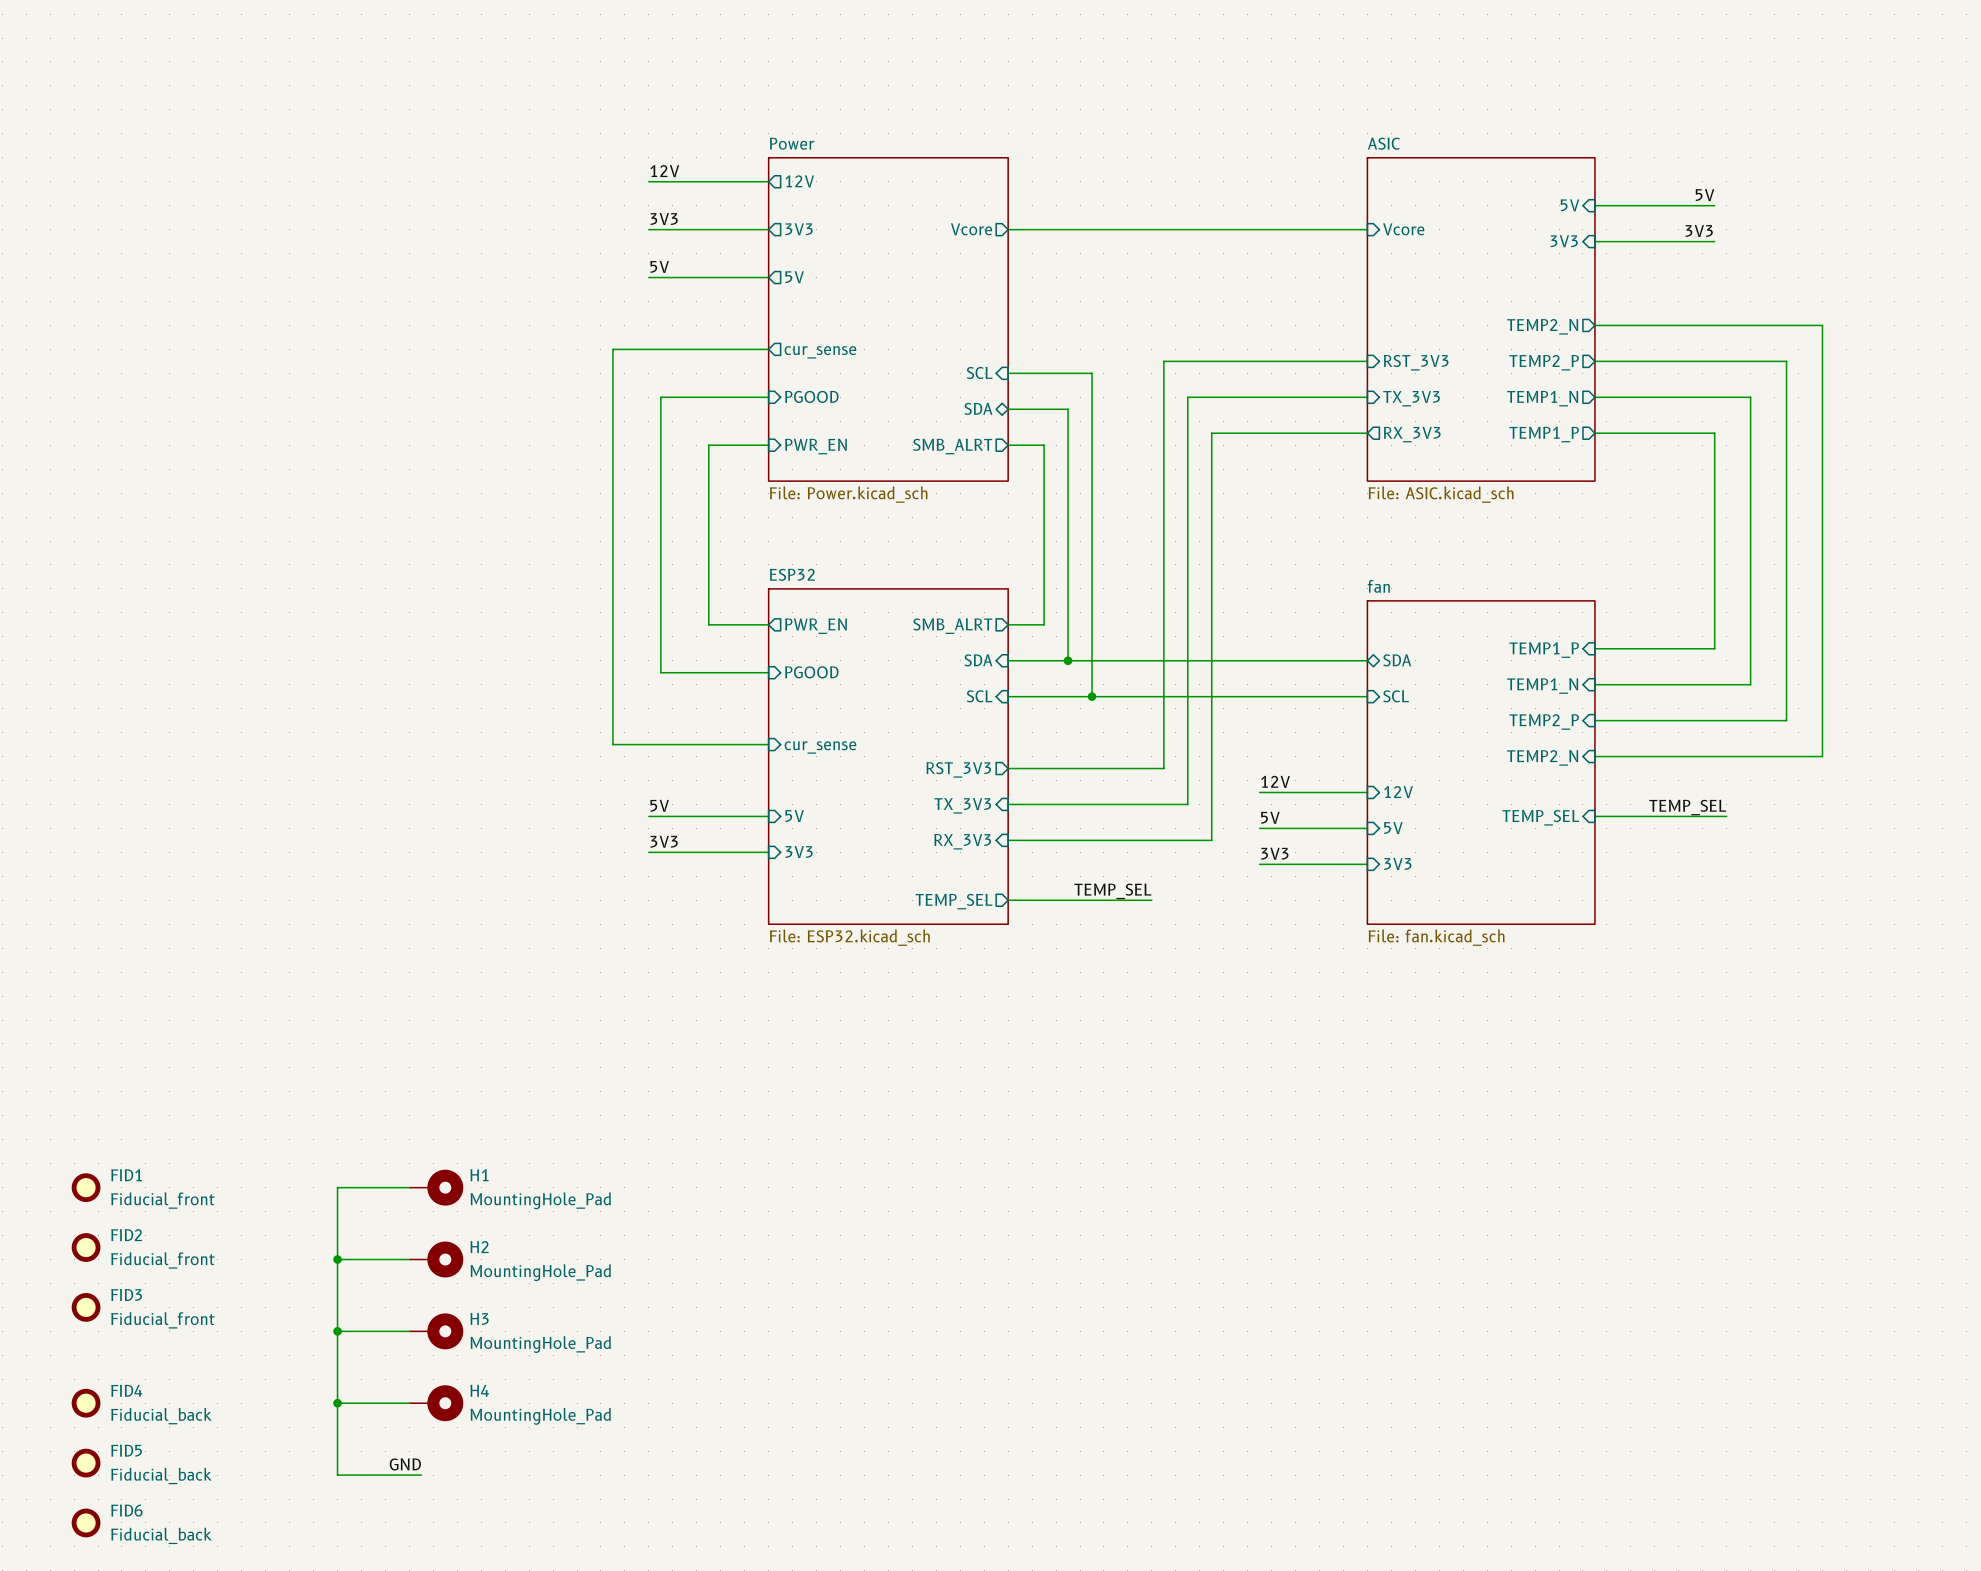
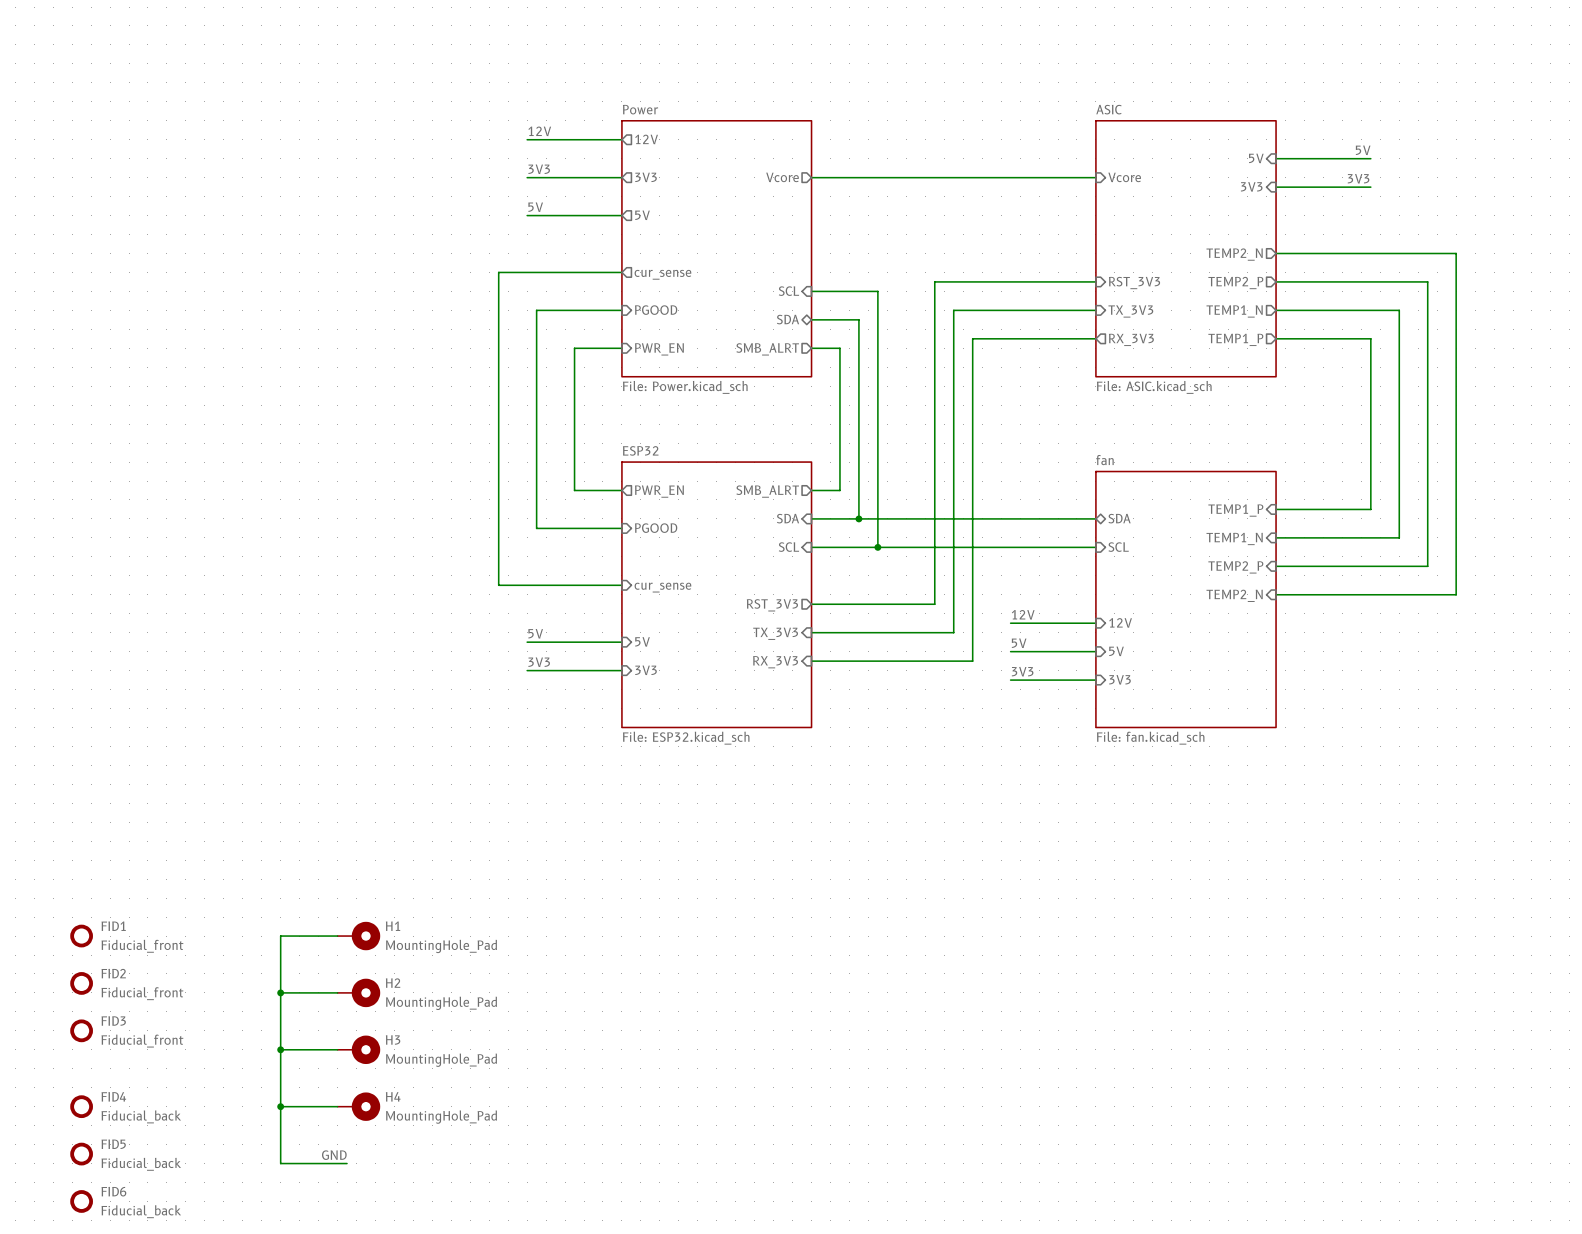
label: TEMP_SEL (1687, 807) -> none
wire: (1594, 816) (1726, 816) -> none
sheet pin: TEMP_SEL (1540, 817) -> none
label: TEMP_SEL (1112, 891) -> none
wire: (1008, 900) (1151, 900) -> none
sheet pin: TEMP_SEL (954, 901) -> none

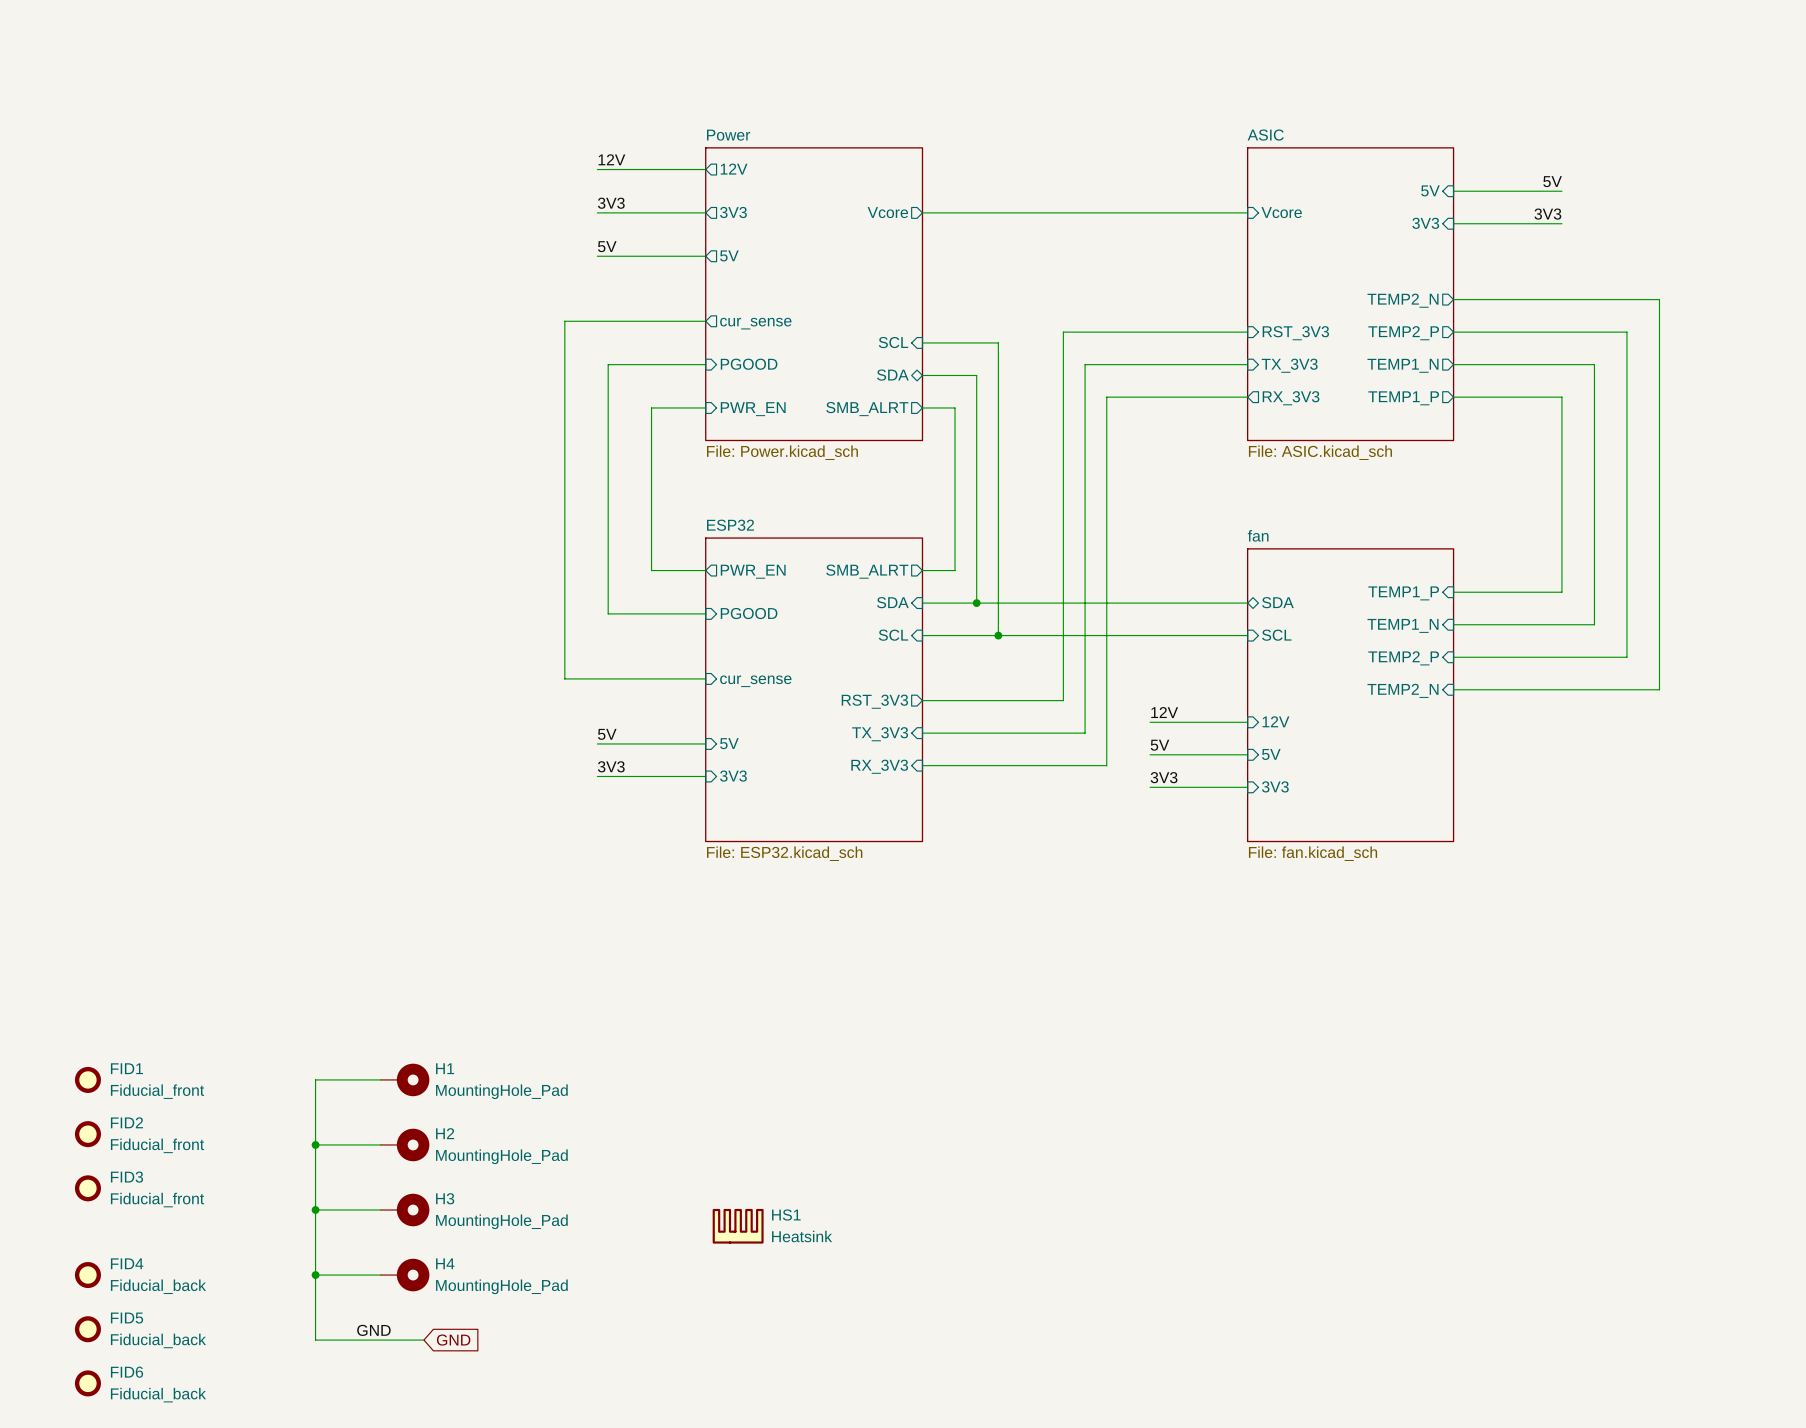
HS1: none -> Heatsink (738, 1226)
wire: none -> (391, 1340) (423, 1340)
global label: none -> GND (453, 1340)

